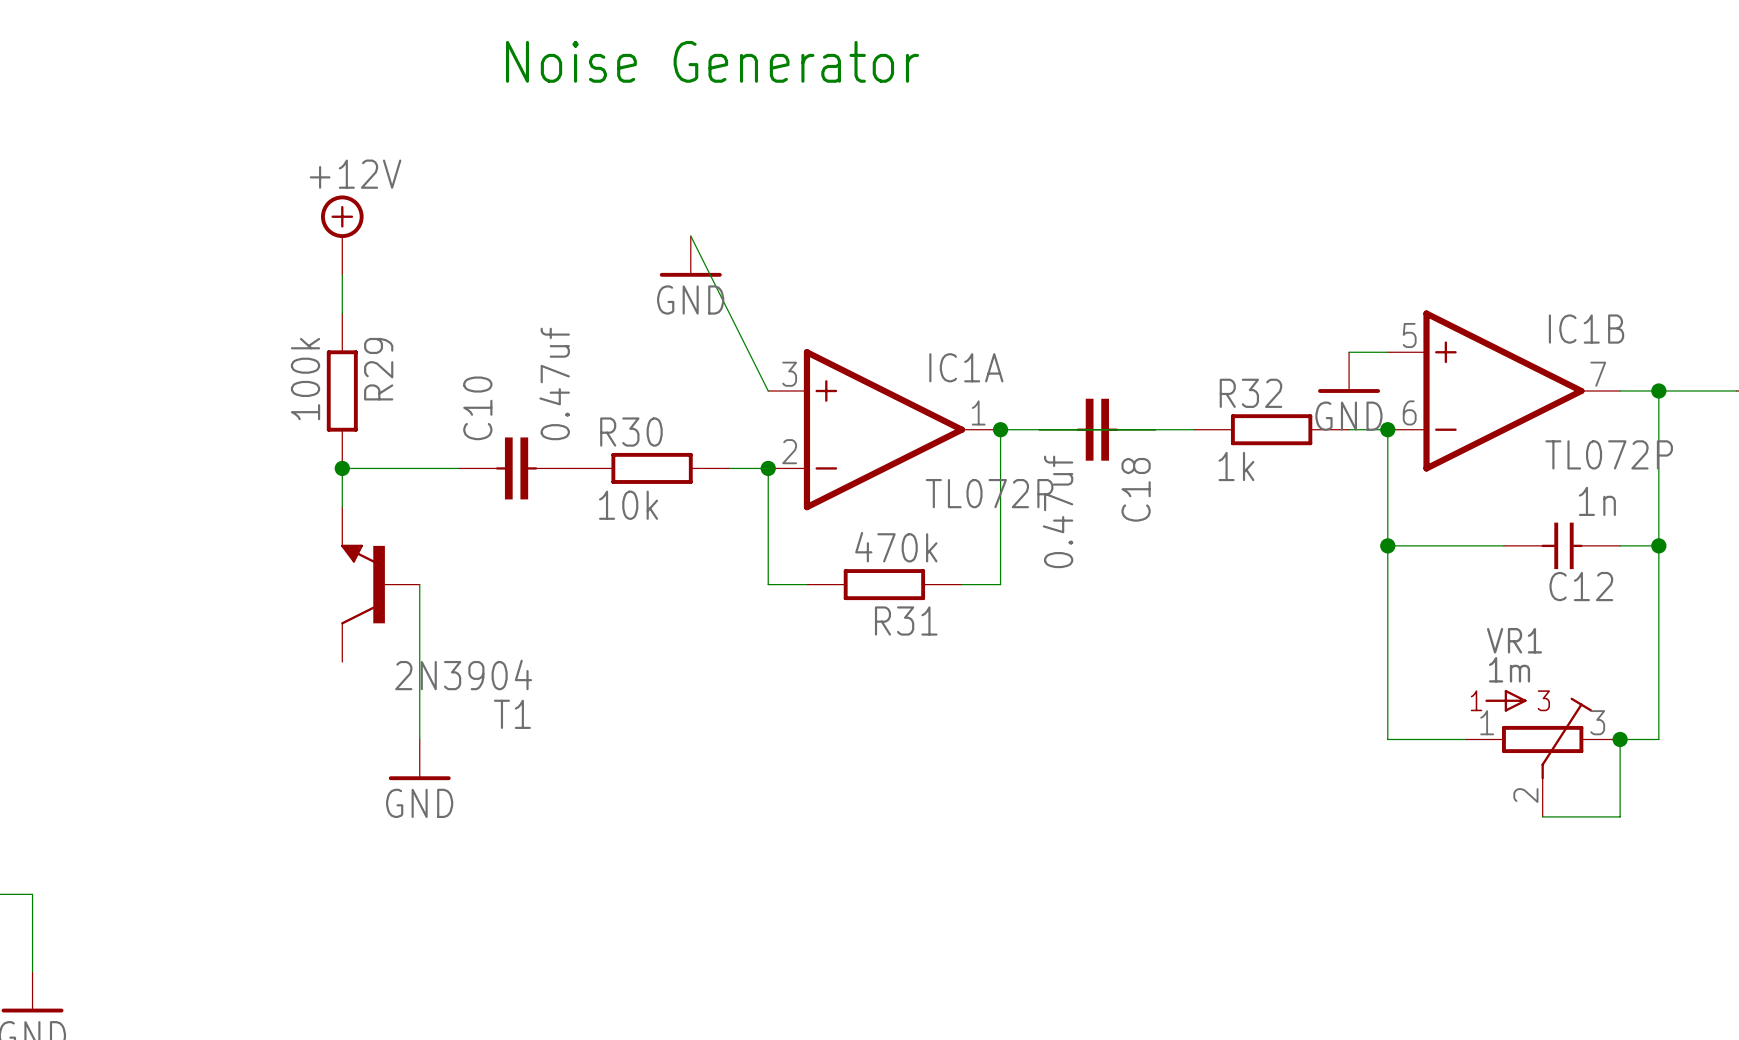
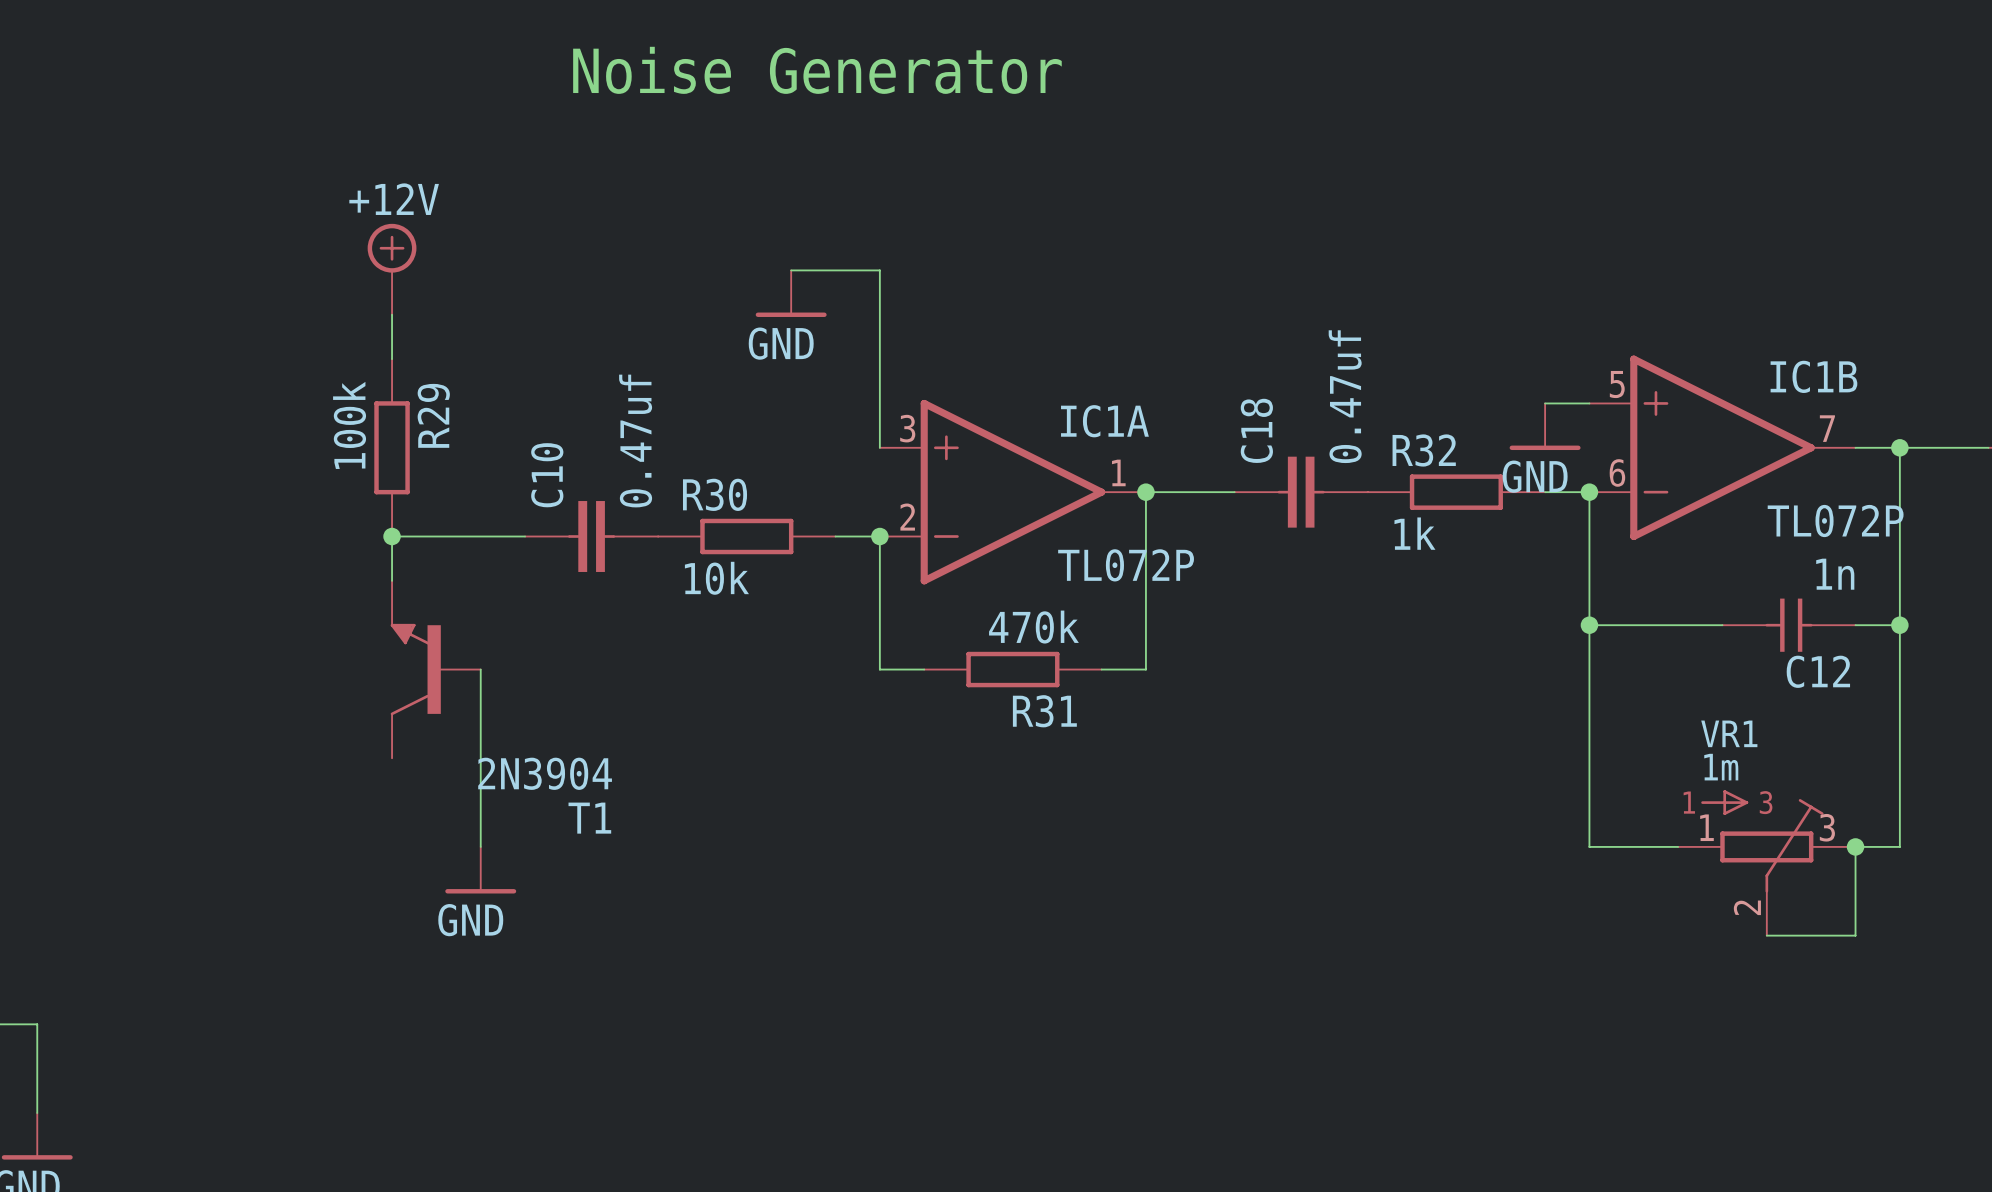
wire: (690, 236) (768, 390) -> (791, 270) (879, 270) (879, 447)
C18 position: (1097, 429) -> (1301, 492)
C18 name position: C18 (1136, 489) -> C18 (1256, 430)
C18 value position: 0.47uf (1058, 511) -> 0.47uf (1345, 396)

